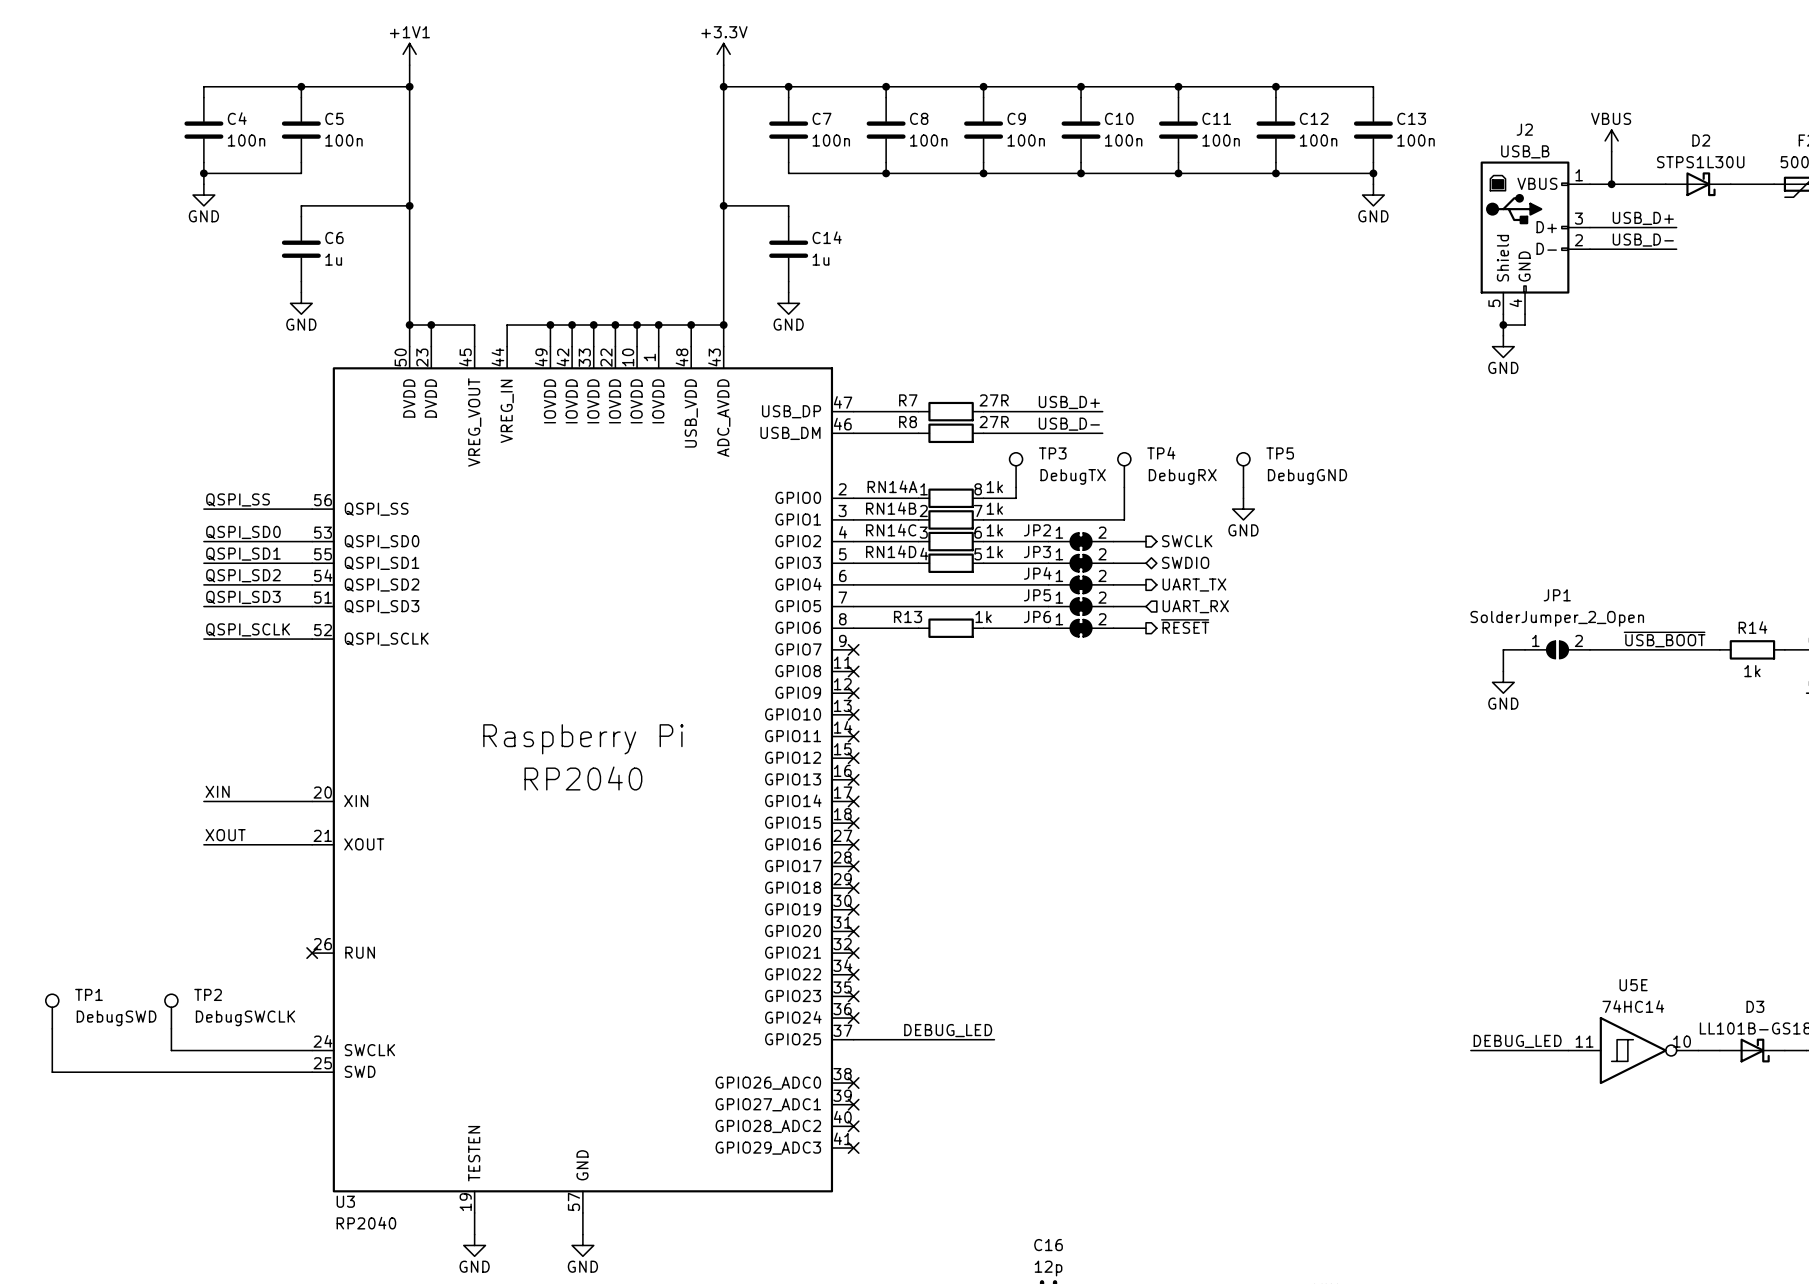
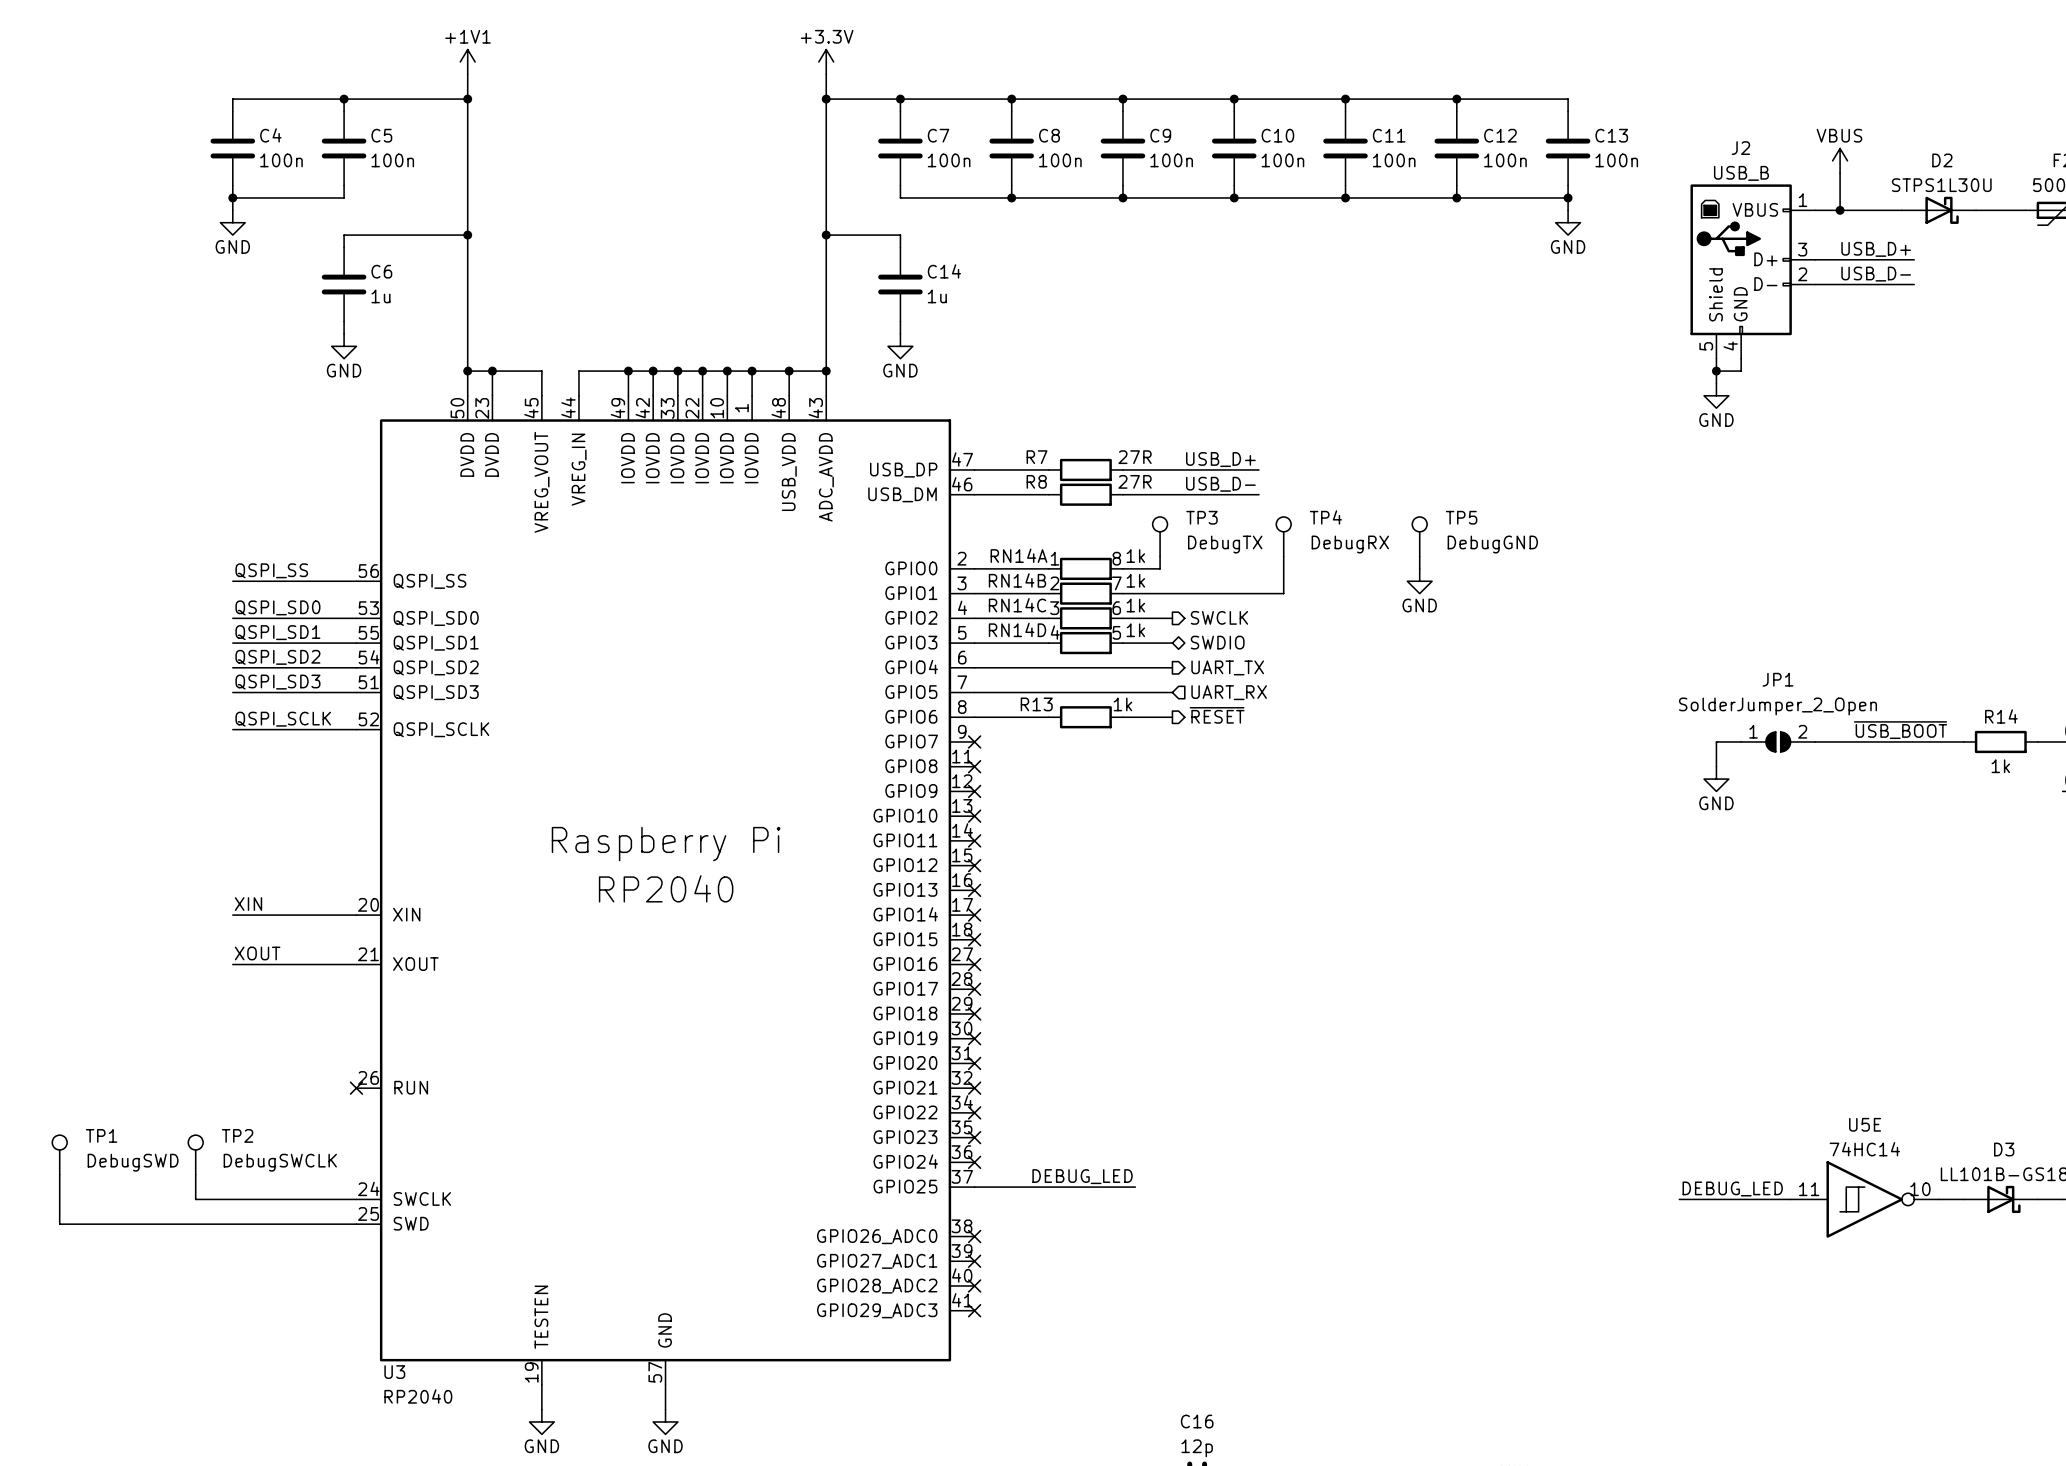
wire: (1026, 541) (1048, 541) -> none
JP2: (1081, 541) -> none
wire: (1113, 541) (1146, 541) -> none
hierarchical label position: SWCLK (1187, 541) -> SWCLK (1219, 617)
hierarchical label position: SWDIO (1185, 562) -> SWDIO (1217, 642)
wire: (1026, 563) (1048, 563) -> none
JP3: (1081, 563) -> none
wire: (1113, 563) (1146, 563) -> none
wire: (1026, 584) (1048, 584) -> none
JP4: (1081, 584) -> none
wire: (1113, 584) (1146, 584) -> none
hierarchical label position: UART_TX (1194, 585) -> UART_TX (1227, 667)
wire: (1026, 606) (1048, 606) -> none
JP5: (1081, 606) -> none
wire: (1113, 606) (1146, 606) -> none
hierarchical label position: UART_RX (1195, 606) -> UART_RX (1229, 692)
hierarchical label position: ~{RESET} (1185, 626) -> ~{RESET} (1217, 715)
wire: (1026, 628) (1048, 628) -> none
JP6: (1081, 628) -> none
wire: (1113, 628) (1146, 628) -> none

